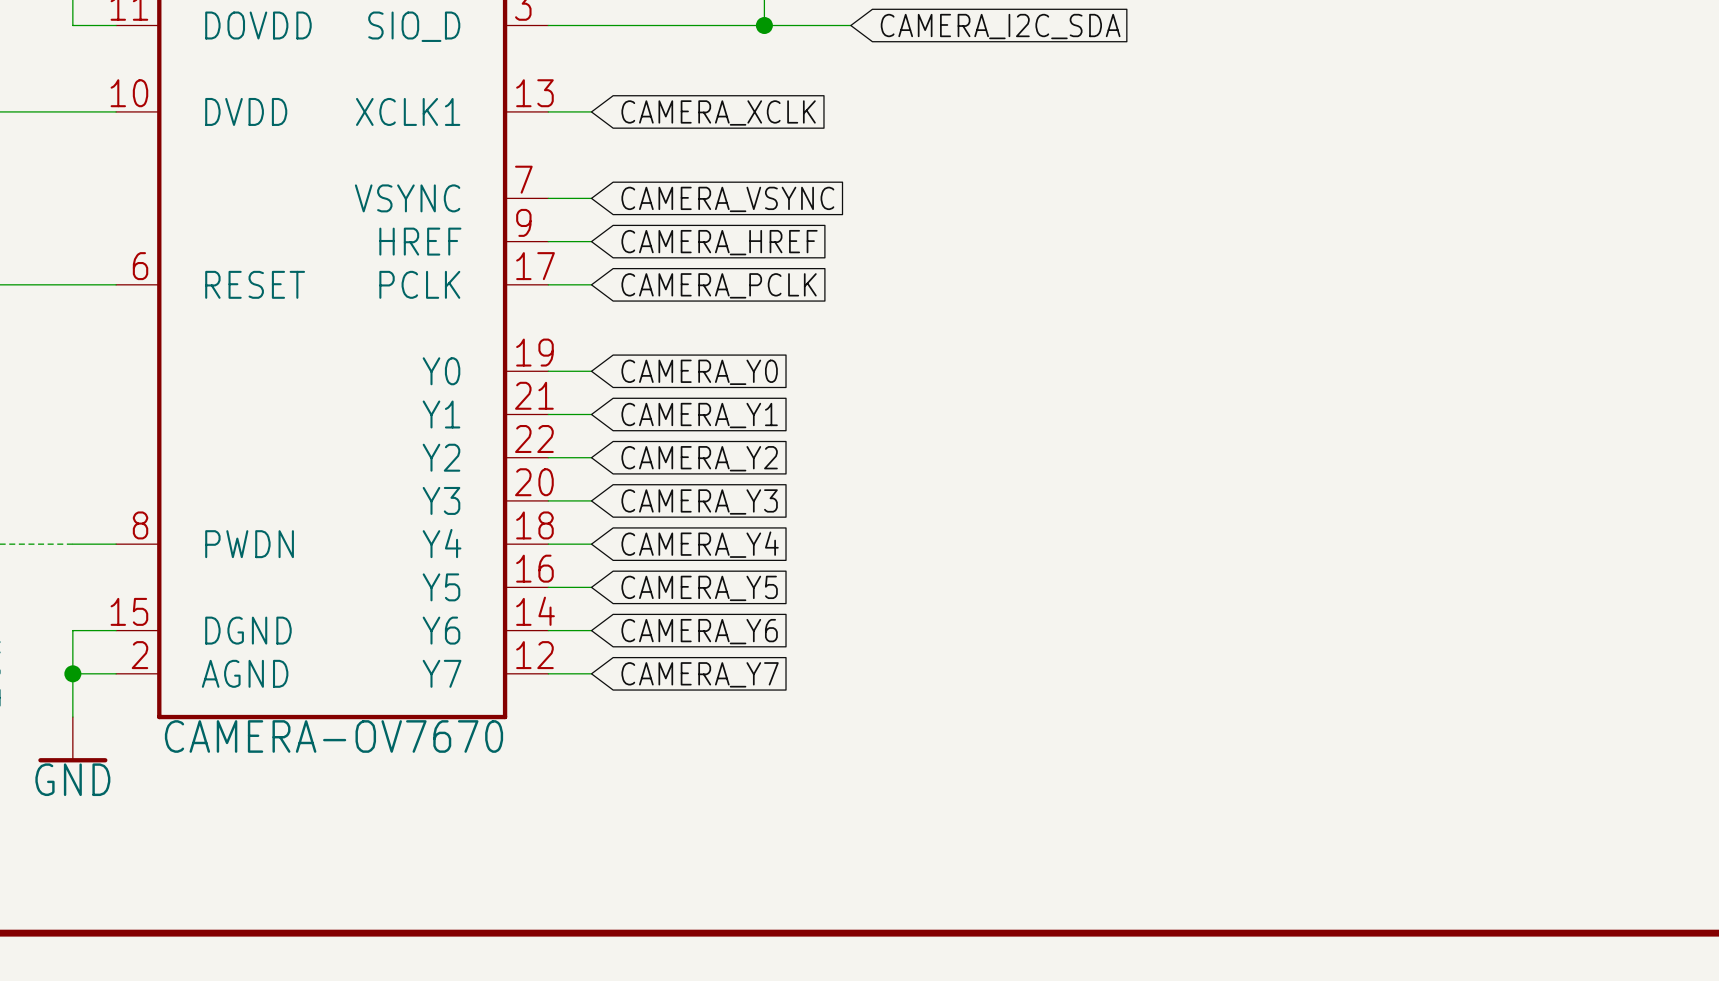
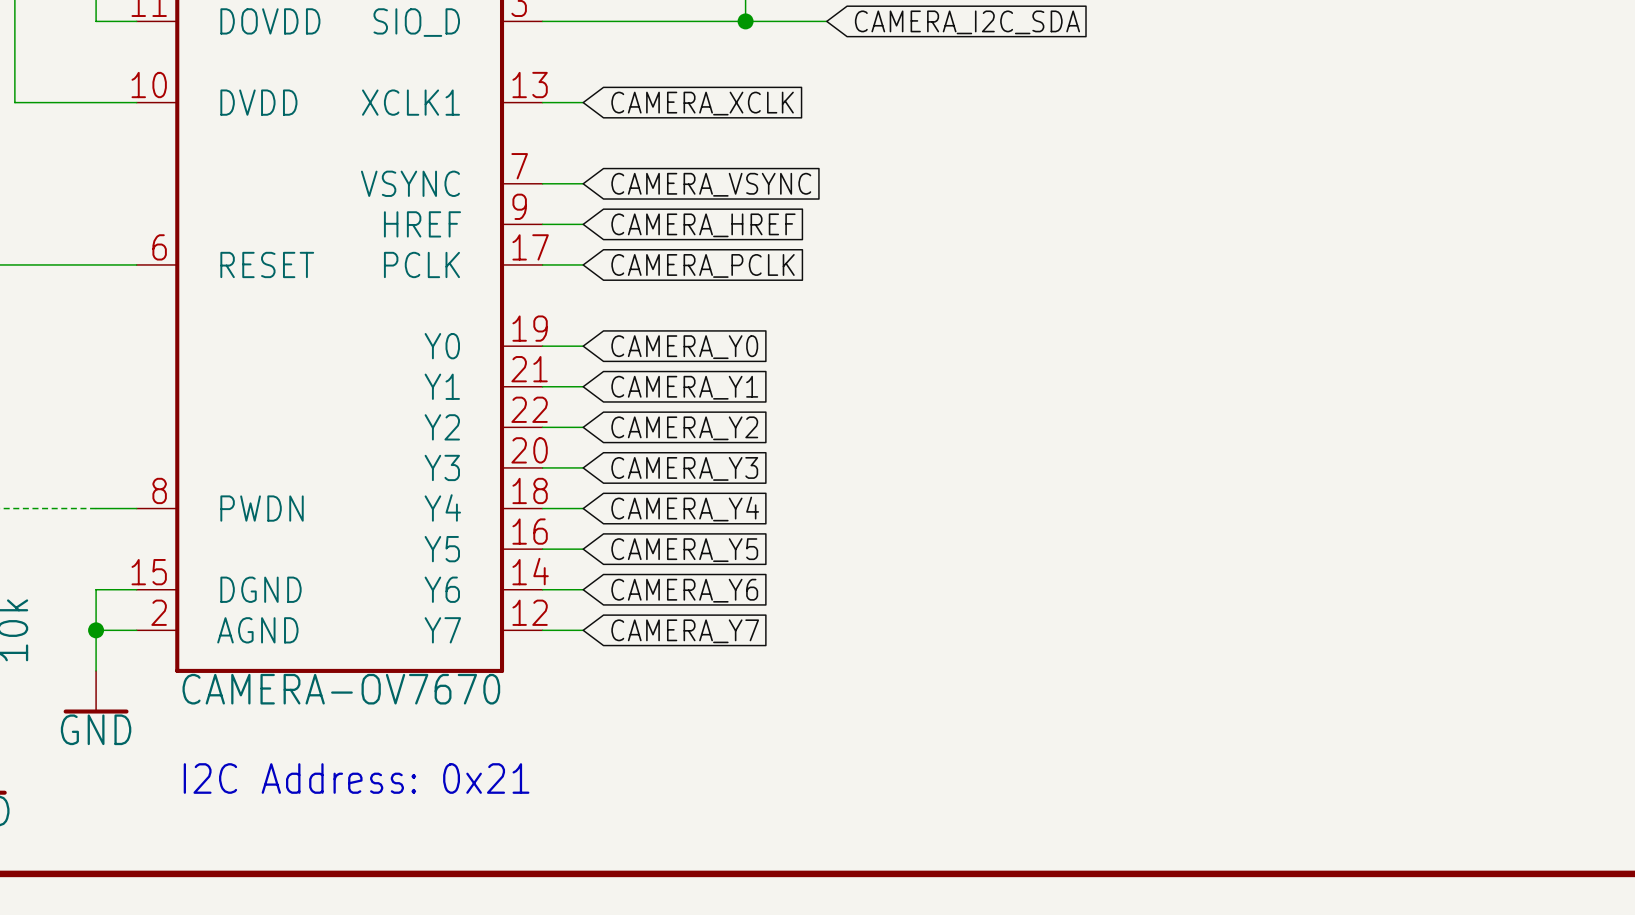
text: none -> I2C Address: 0x21 (356, 778)

